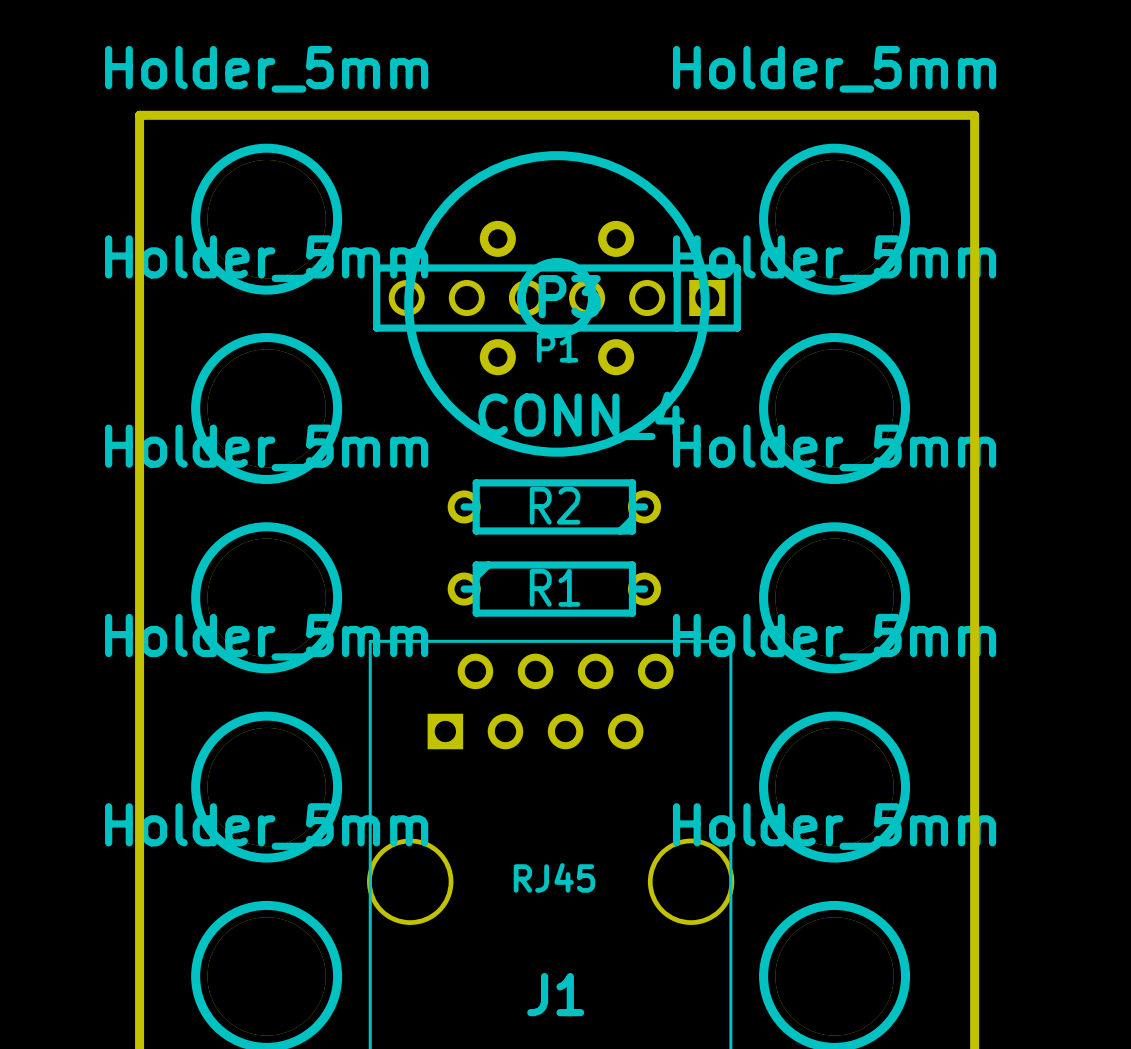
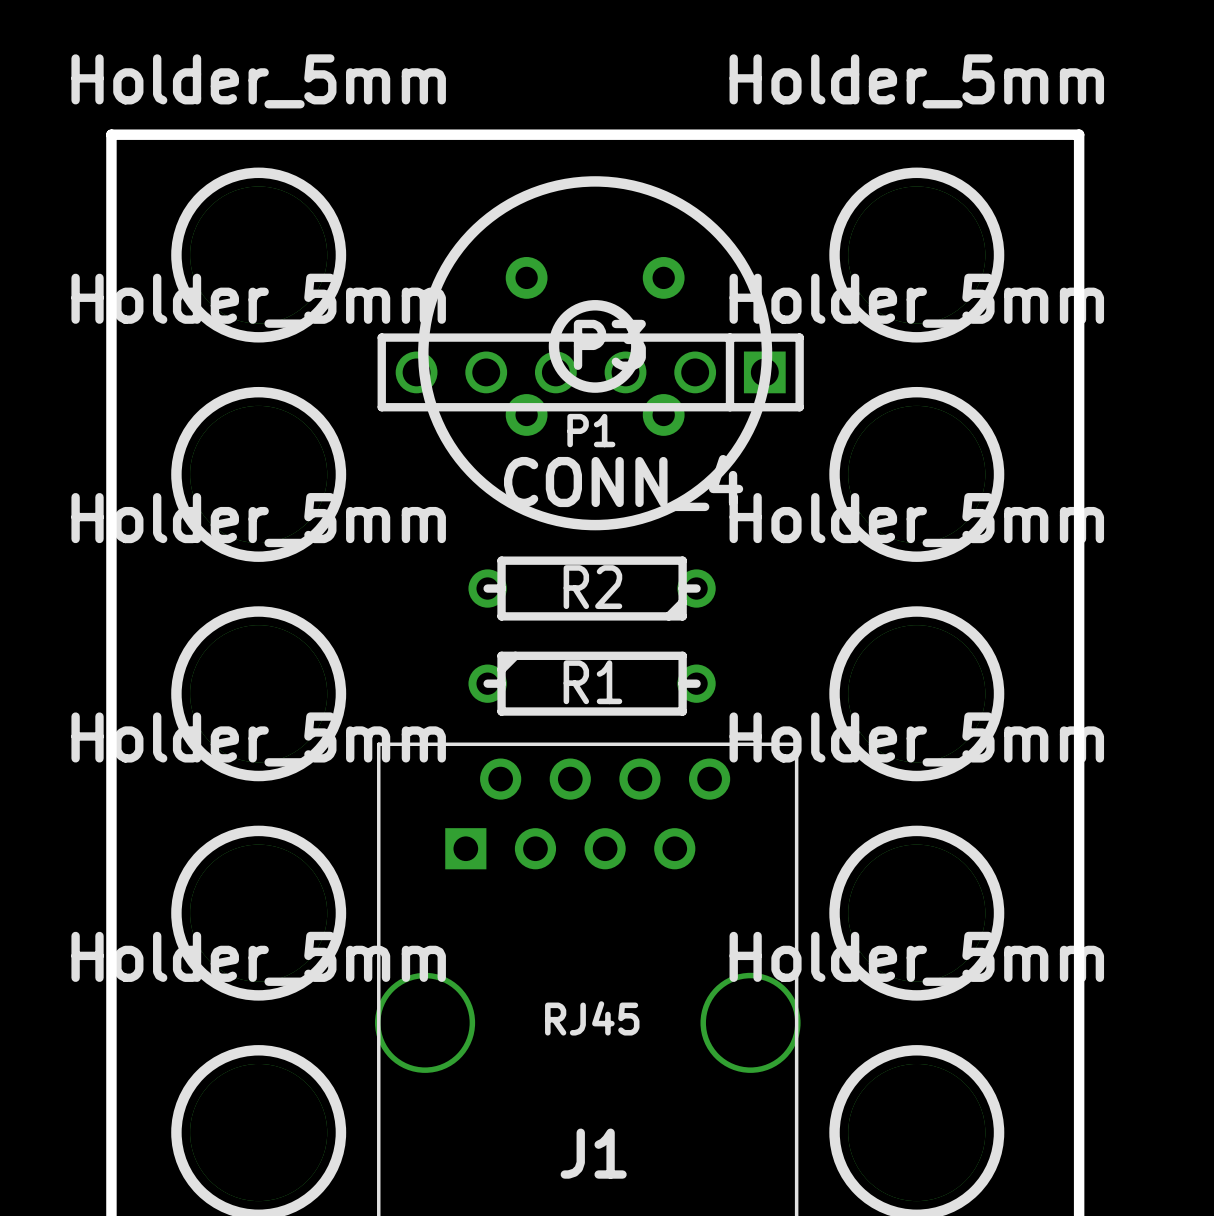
P1 position: (556, 298) -> (590, 372)

